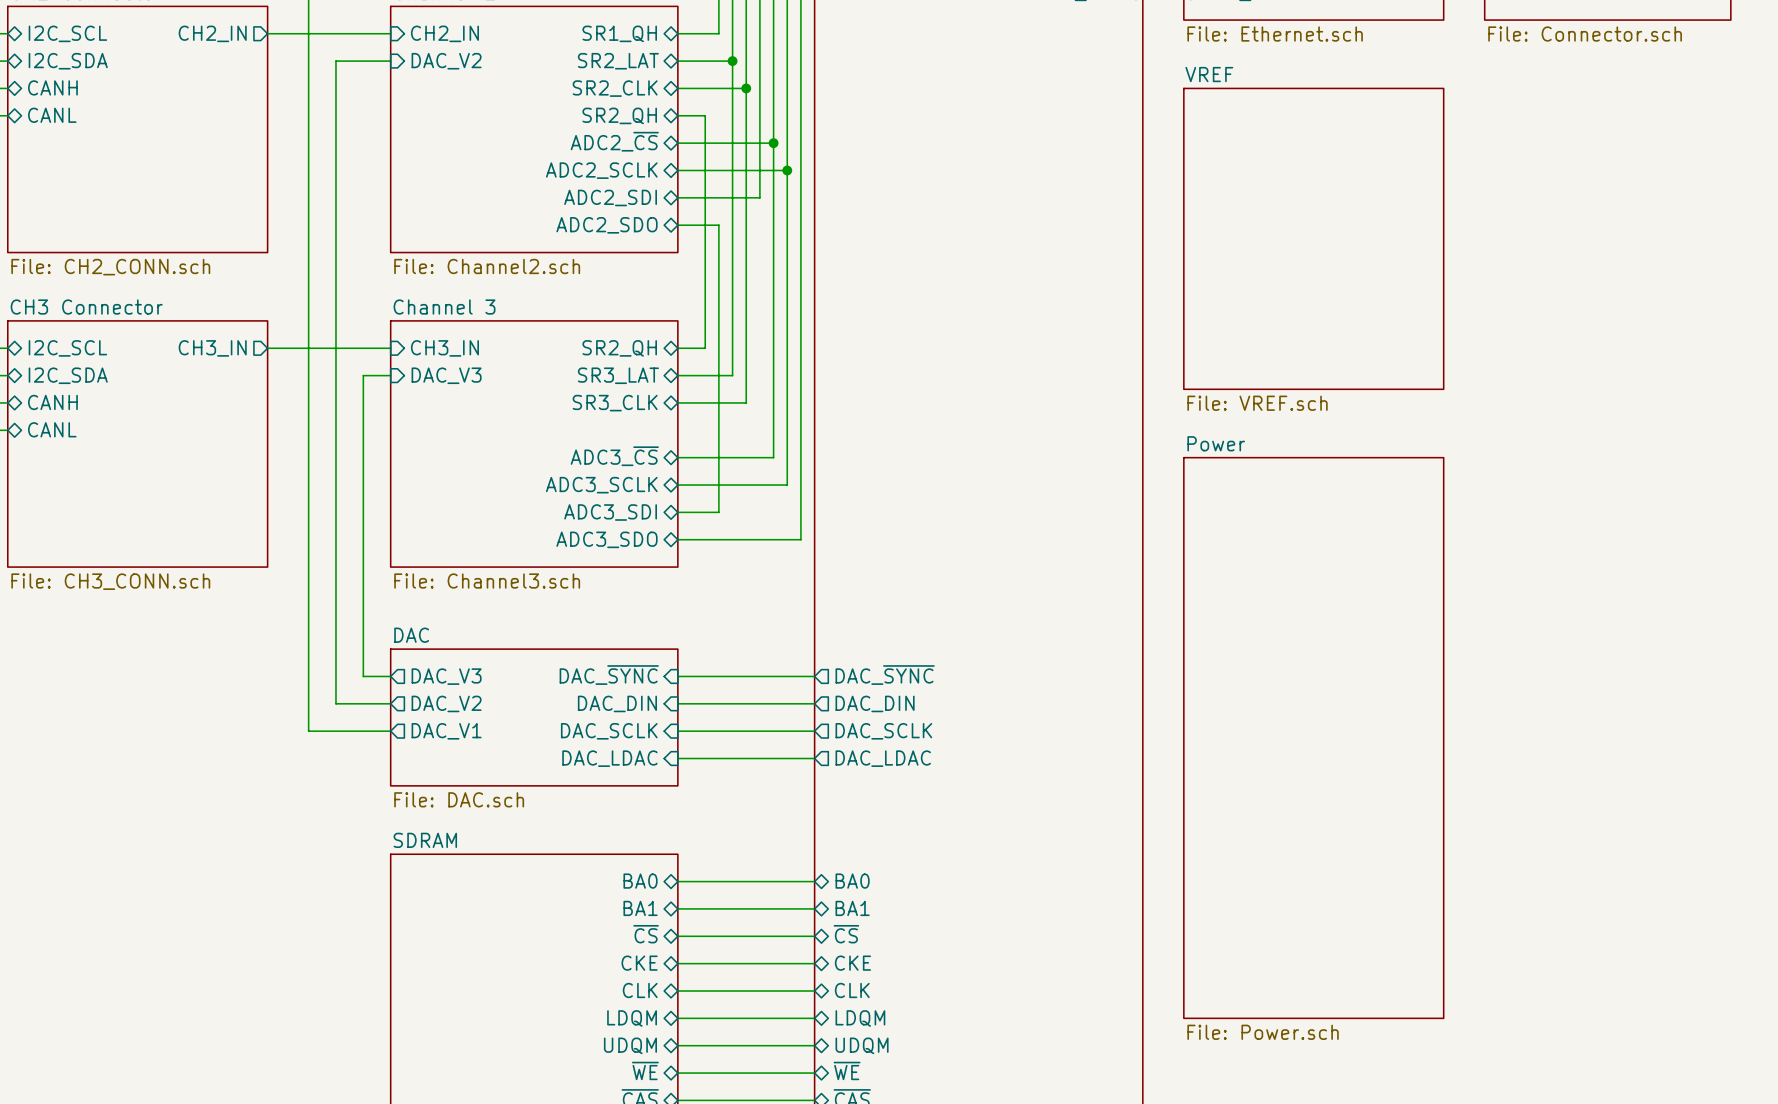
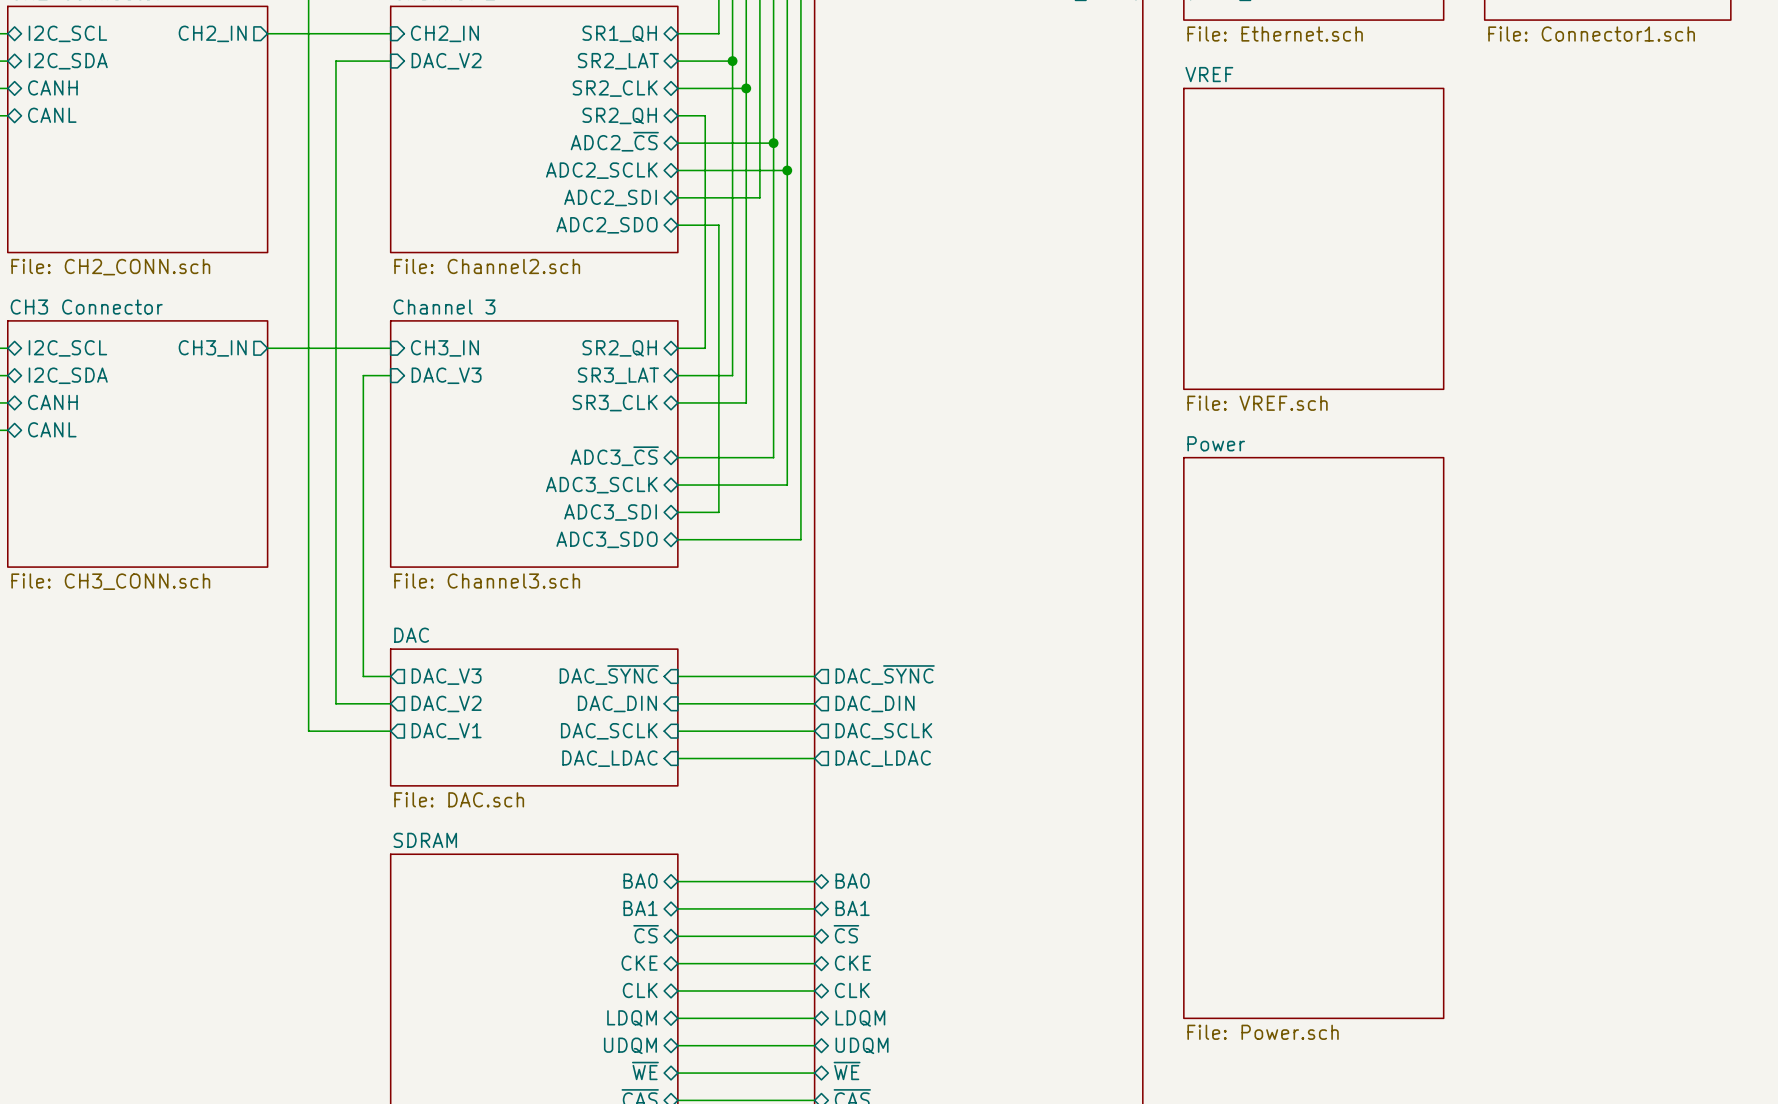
sheet value: File: Connector.sch (1585, 34) -> File: Connector1.sch (1591, 34)

